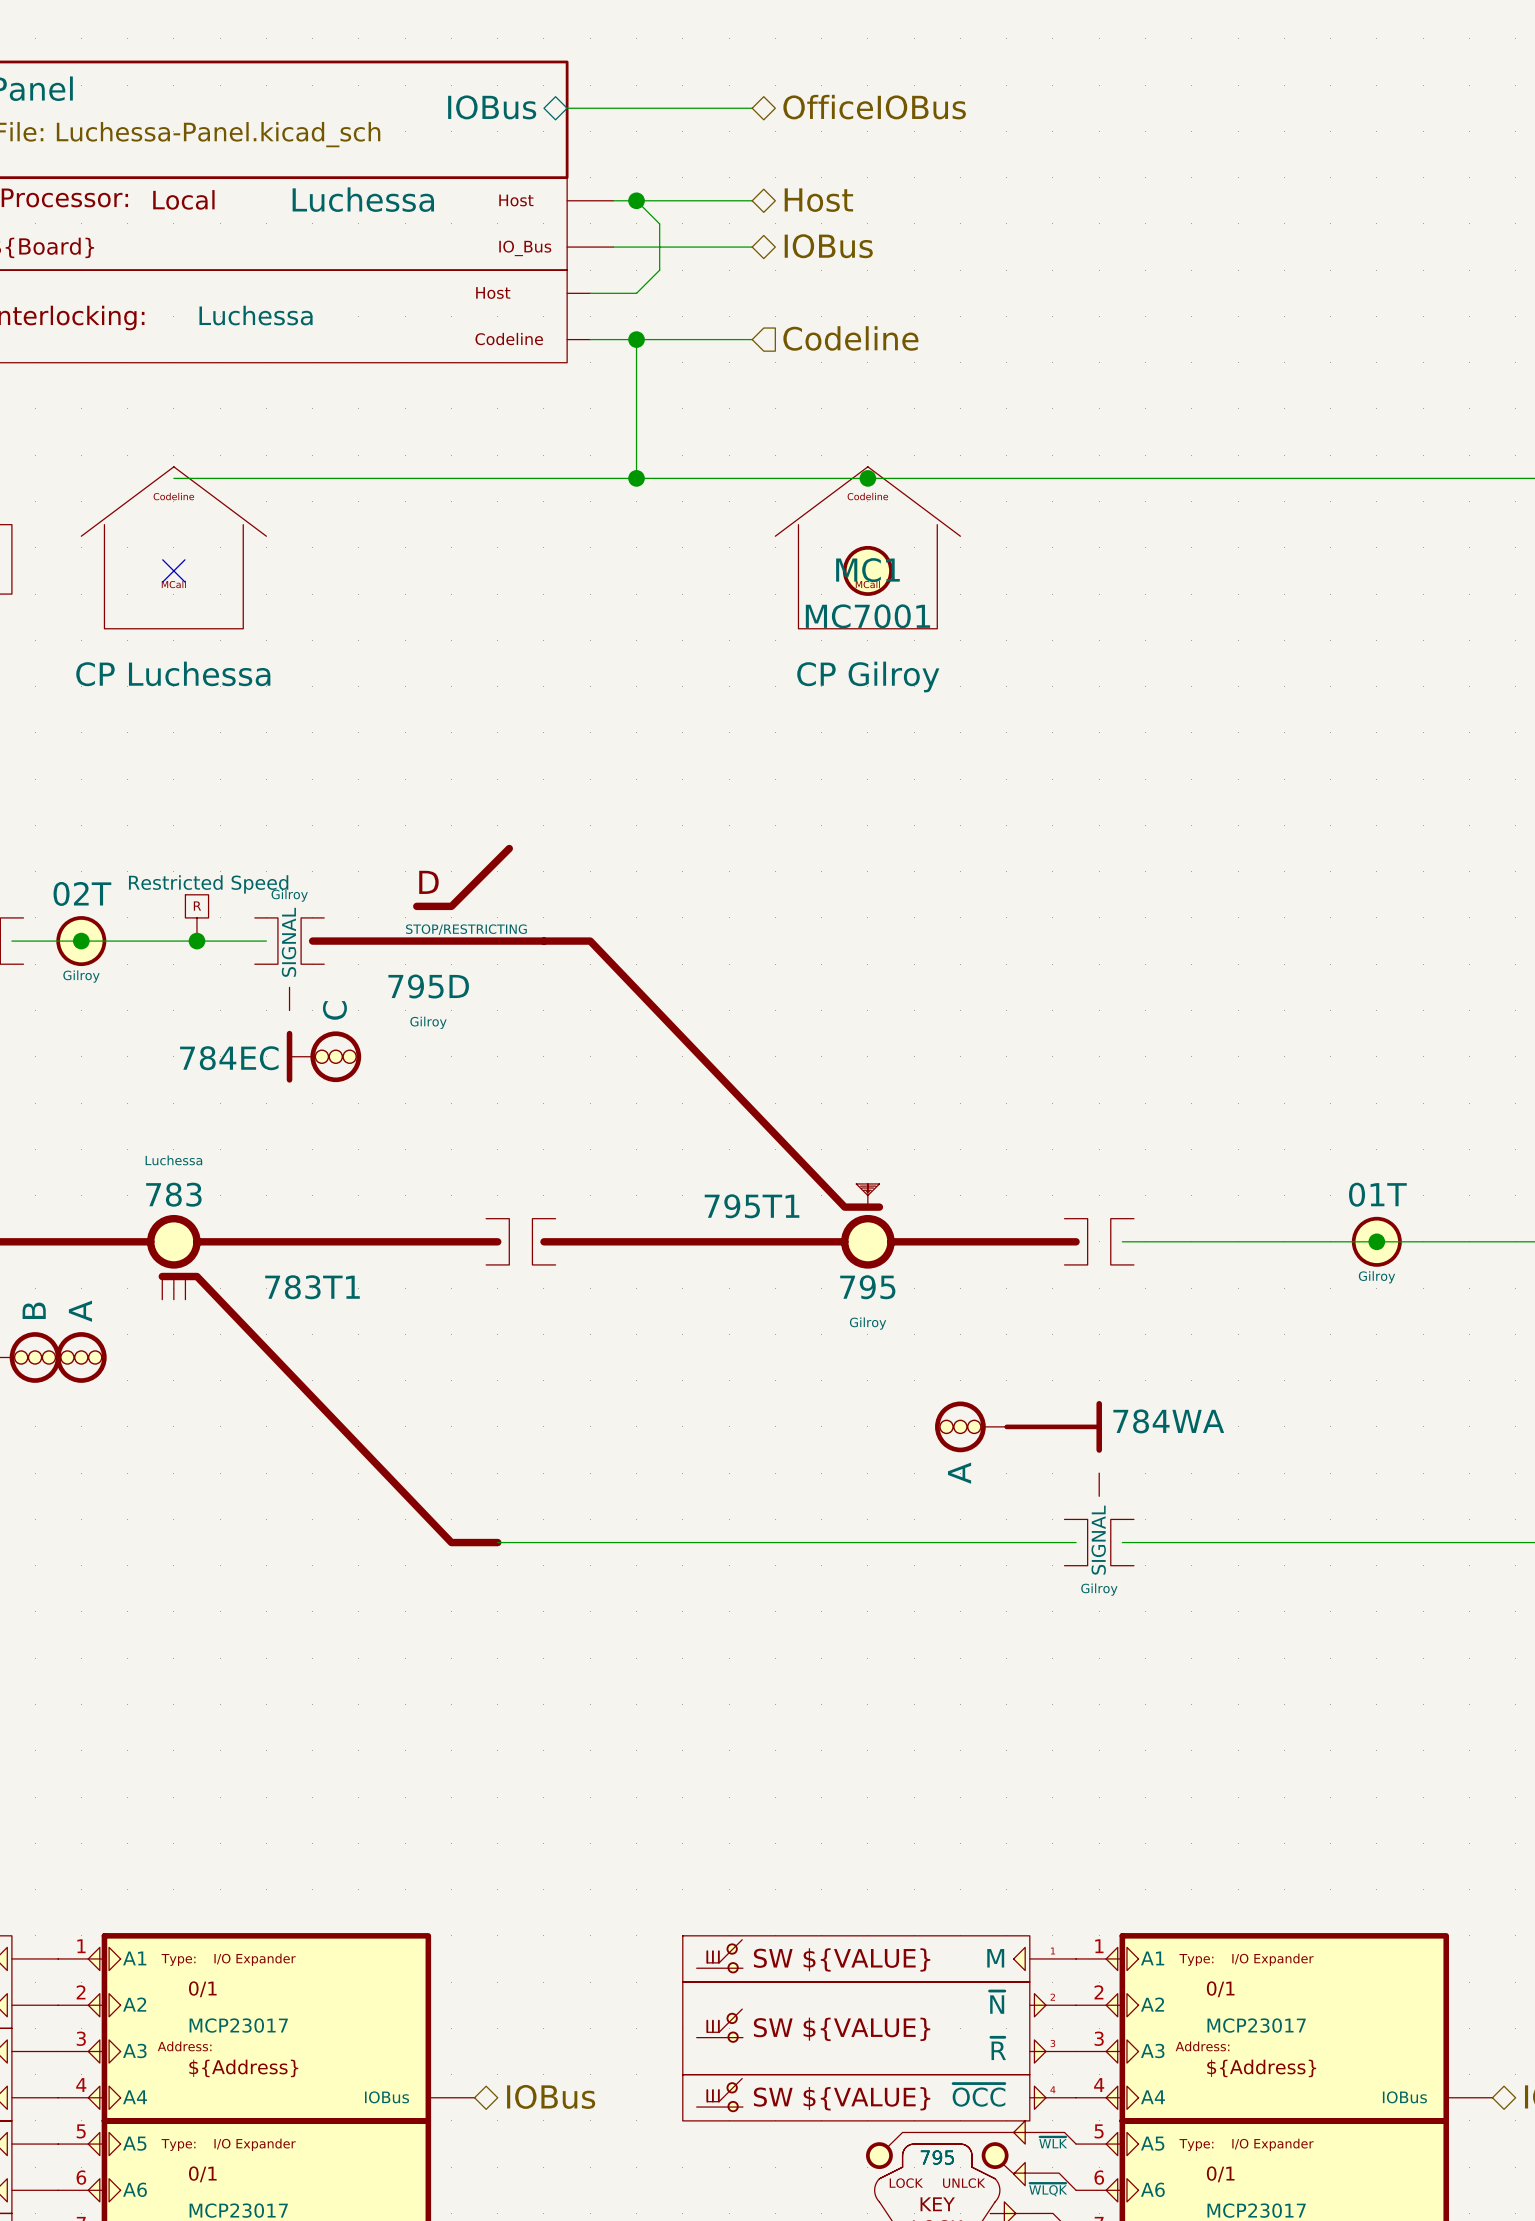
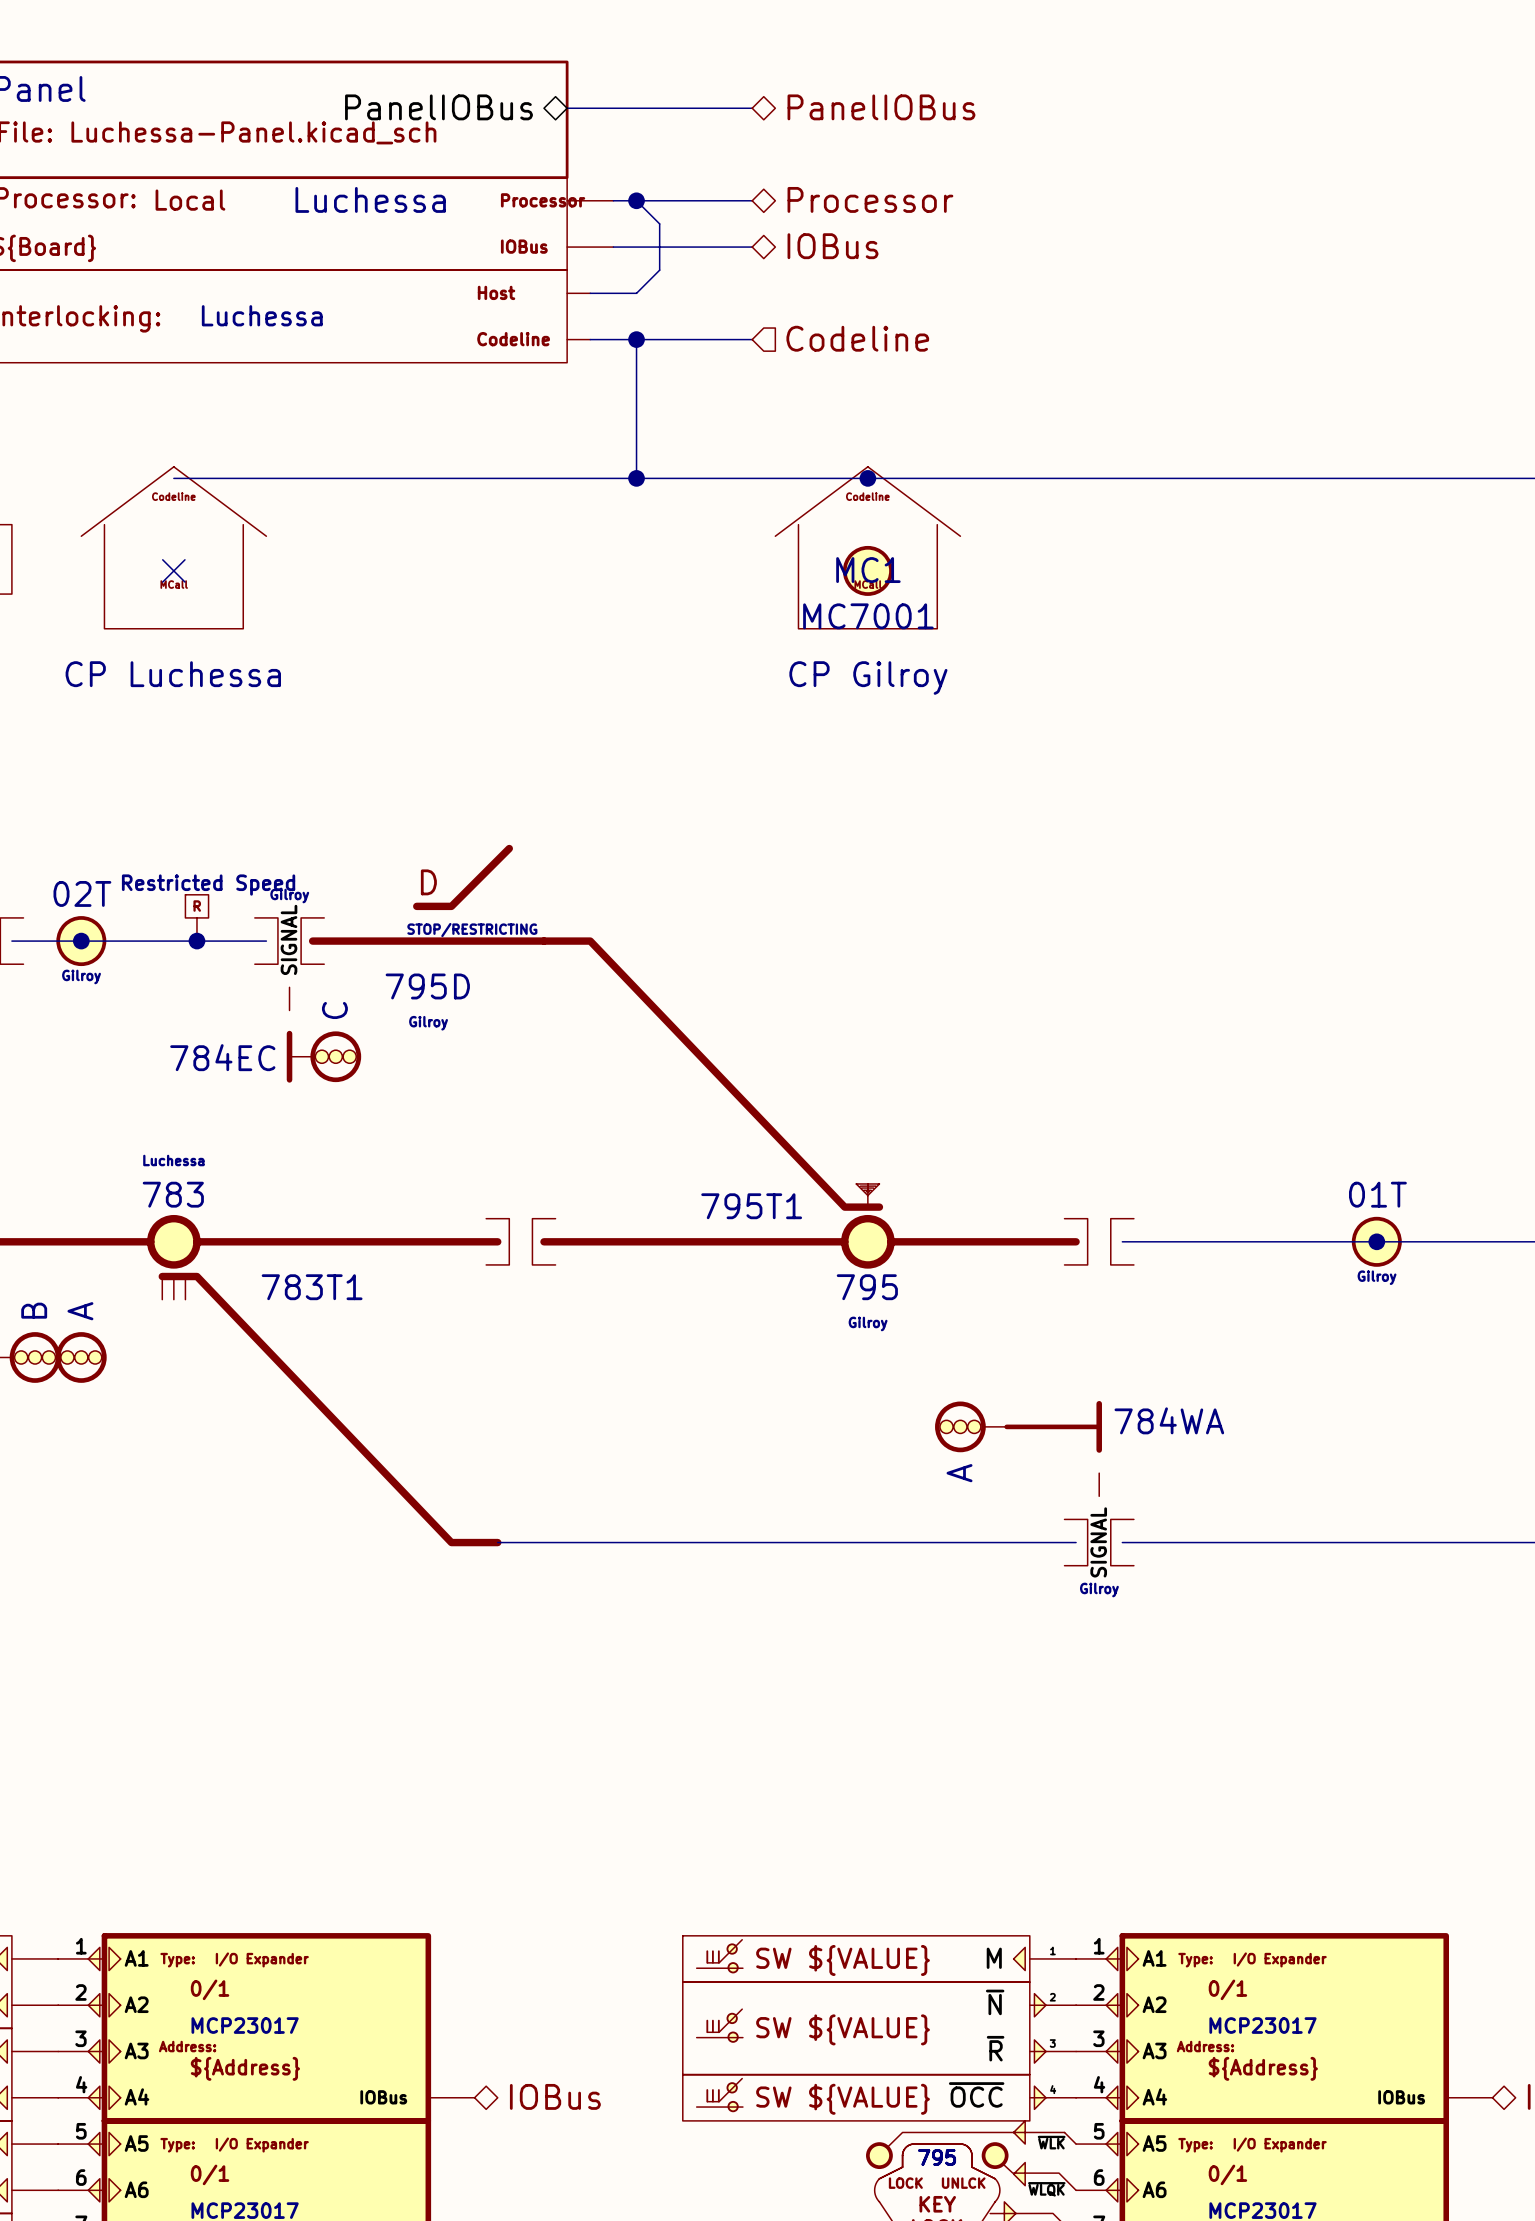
sheet pin: IOBus (492, 107) -> PanelIOBus (438, 107)
hierarchical label: OfficeIOBus (874, 107) -> PanelIOBus (881, 107)
part text: Host (516, 200) -> Processor (543, 200)
hierarchical label: Host (818, 200) -> Processor (870, 199)
part text: IO_Bus (525, 248) -> IOBus (524, 246)

